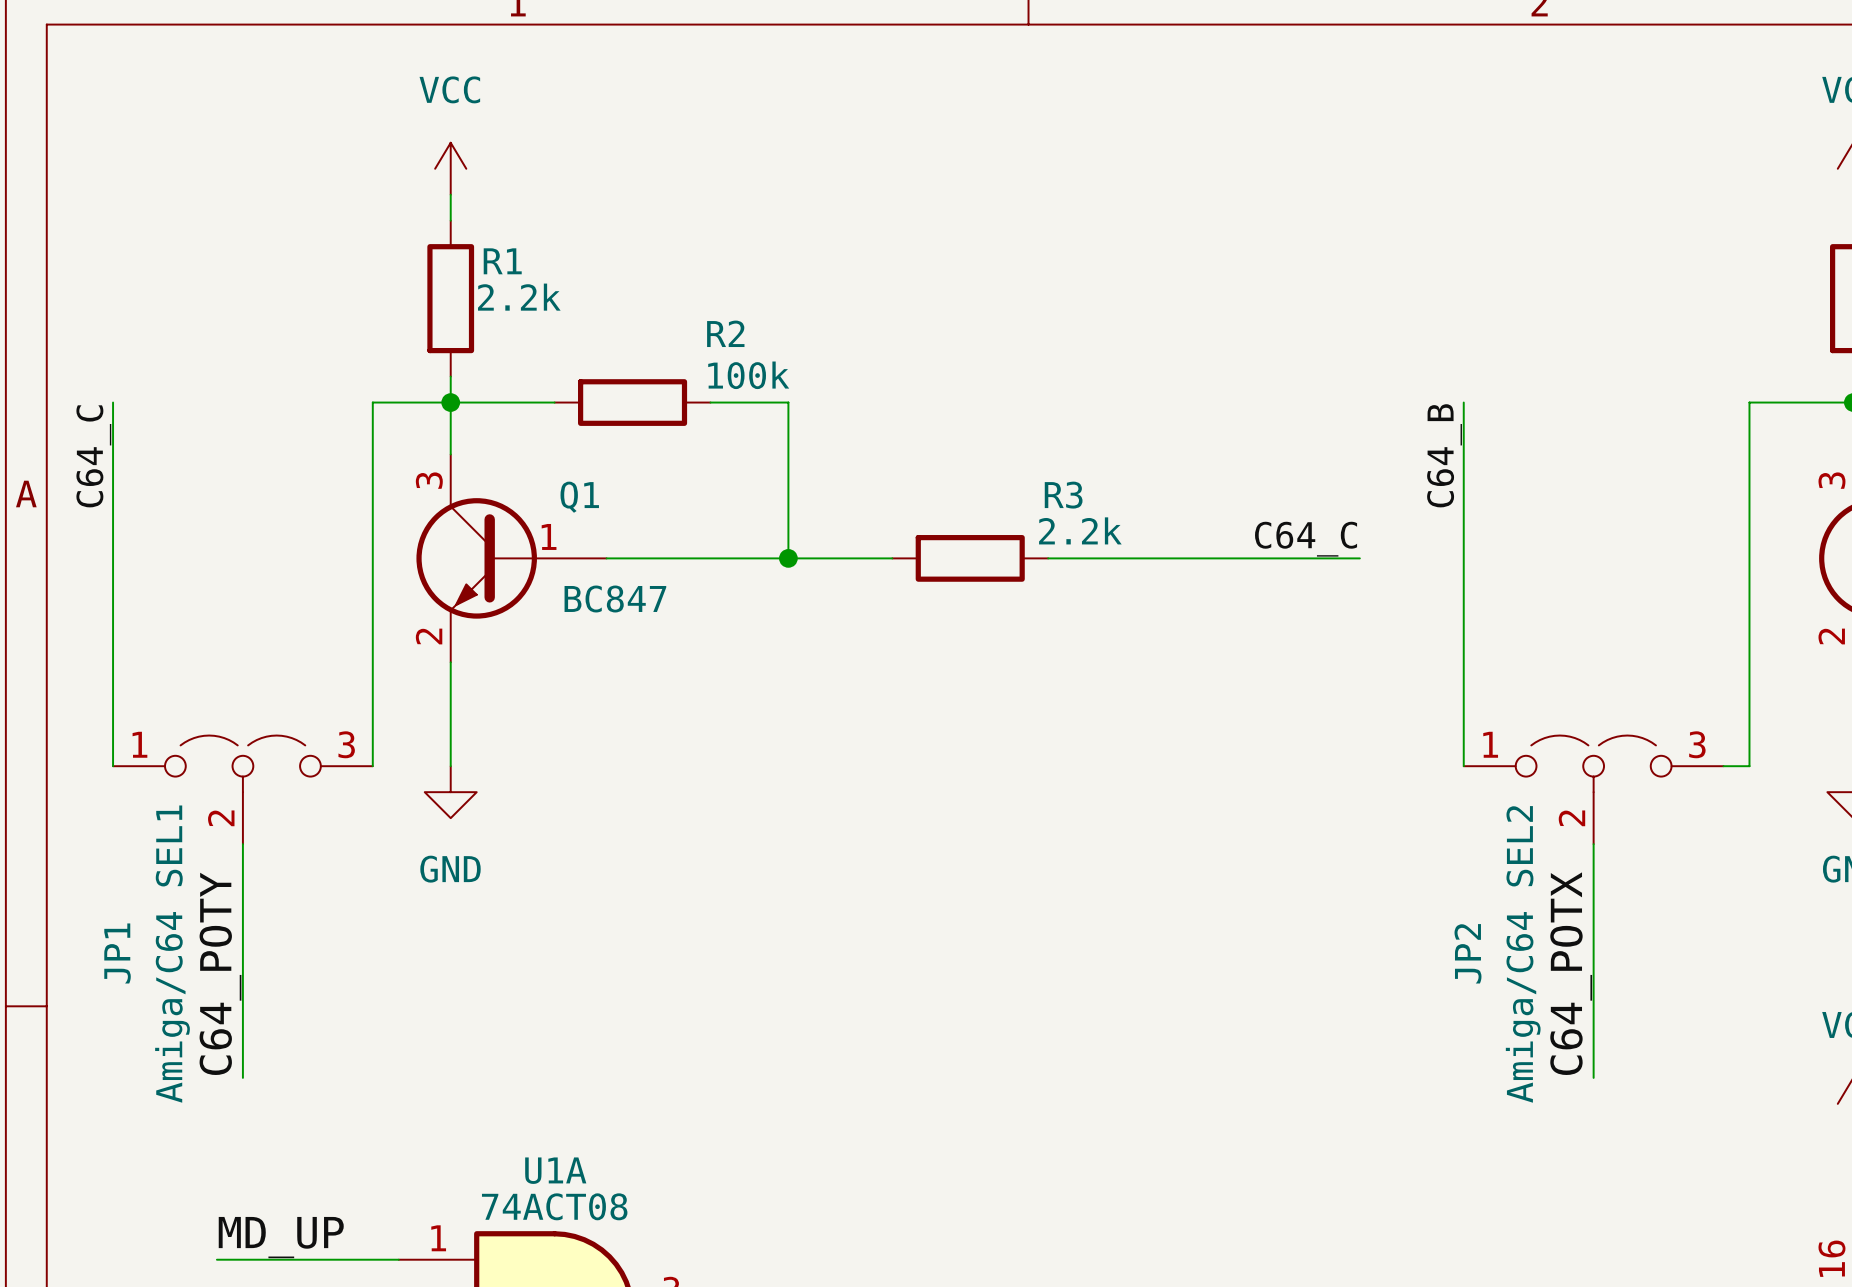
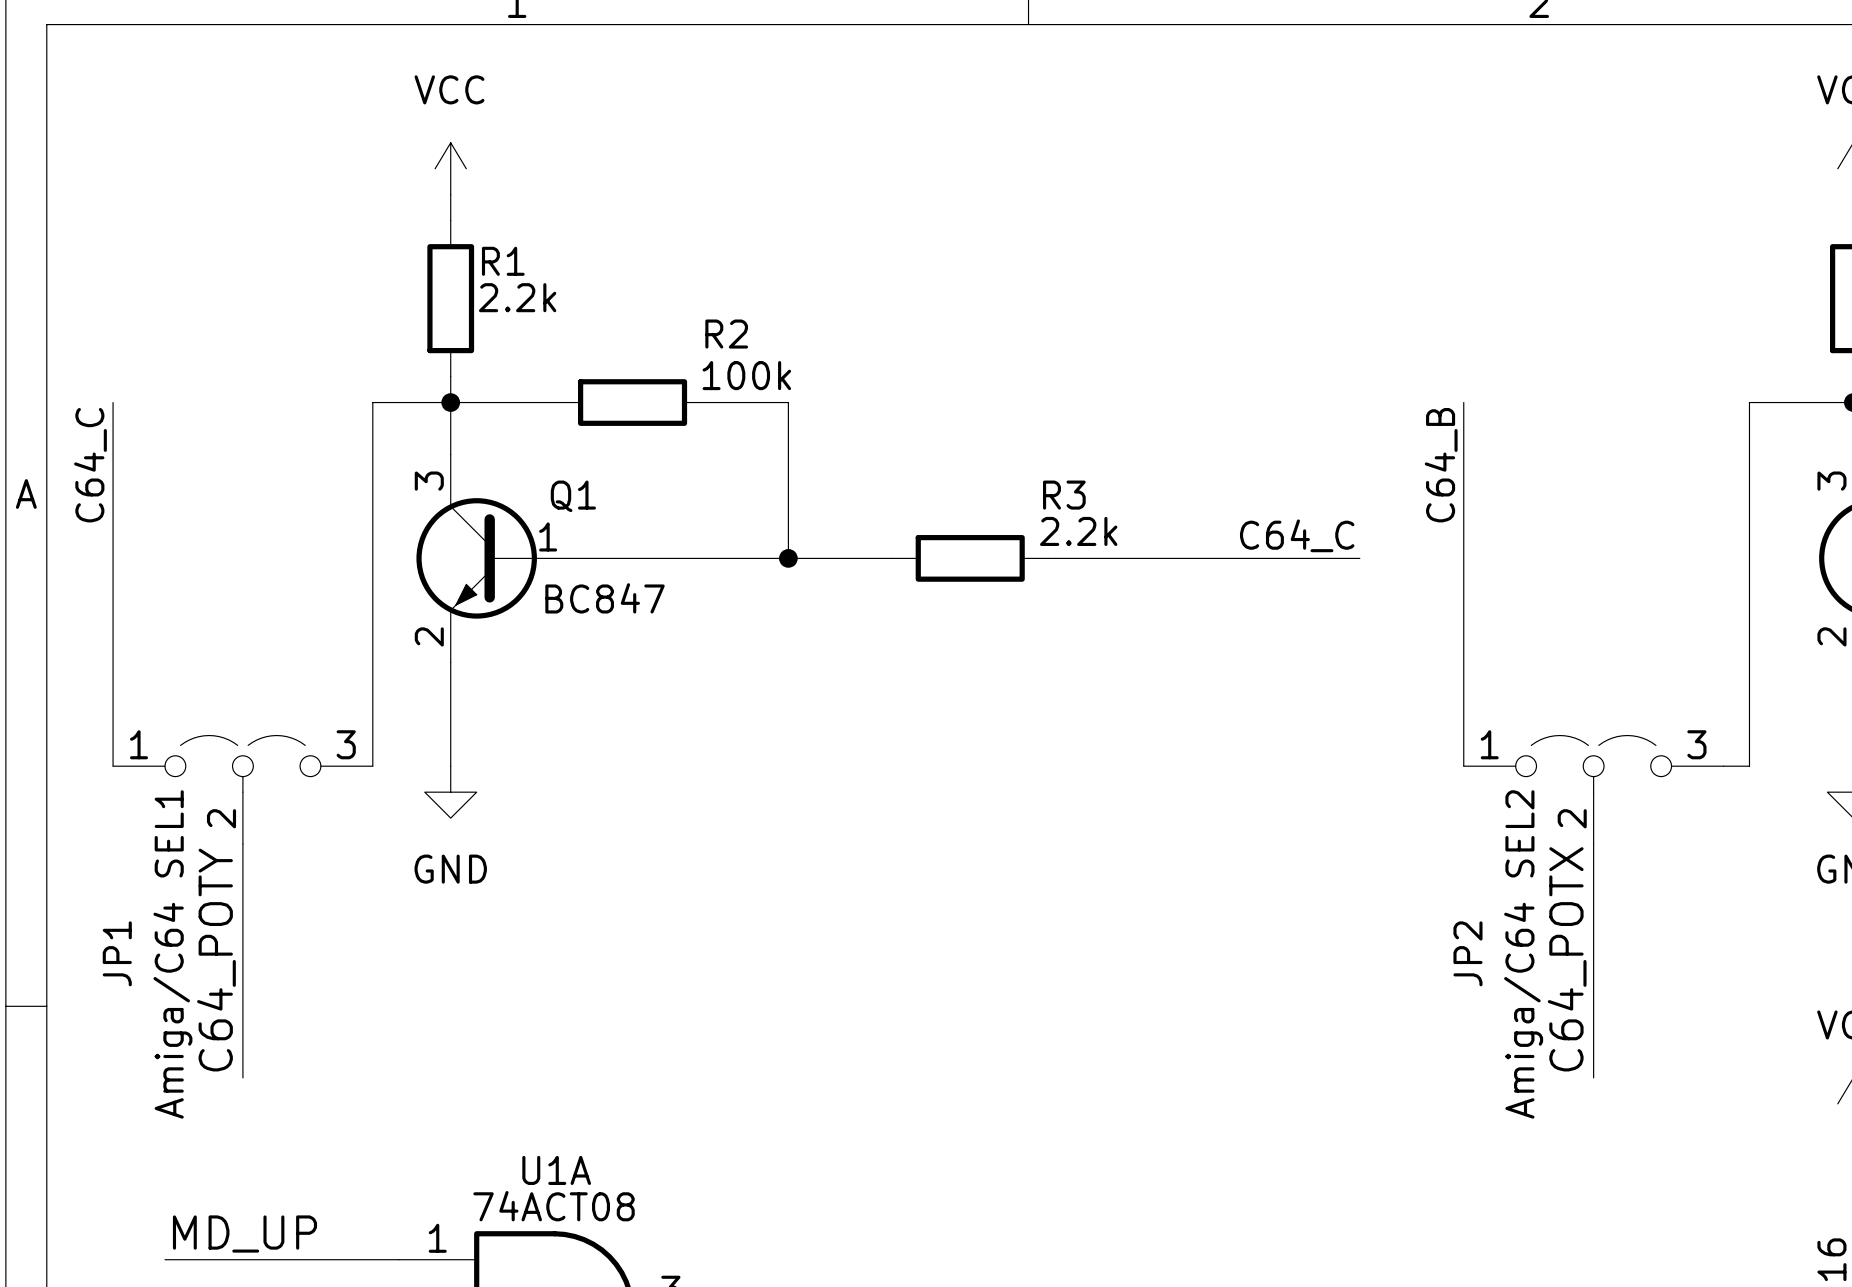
label position: MD_UP (281, 1237) -> MD_UP (244, 1234)
wire: none -> (165, 1259) (216, 1259)

